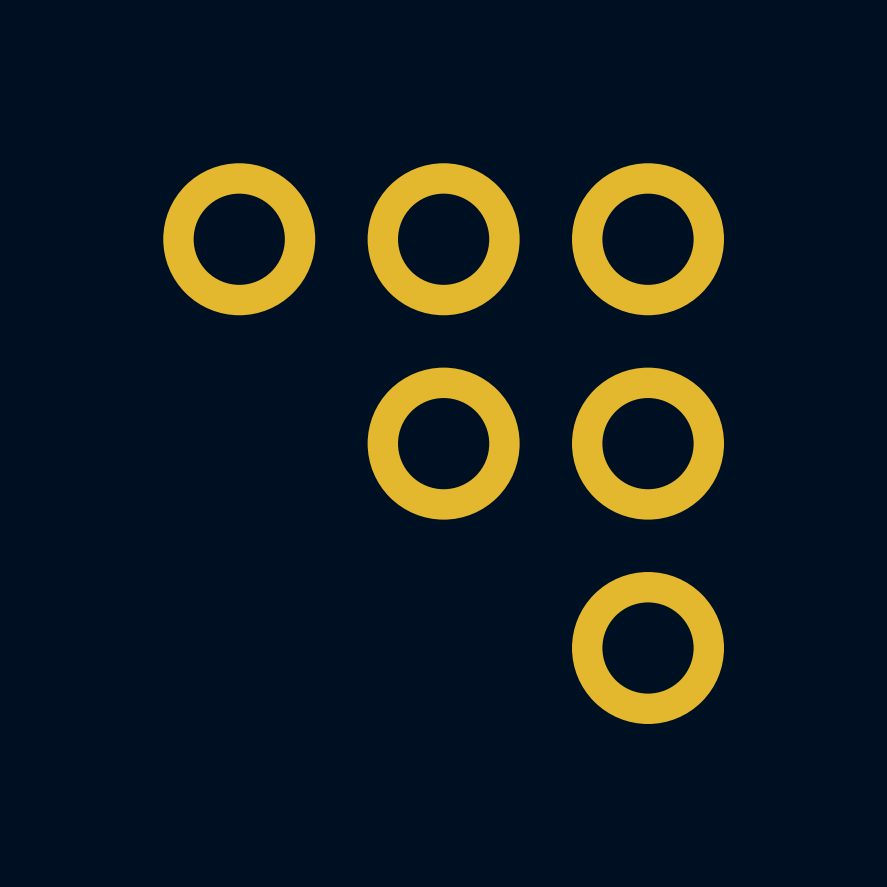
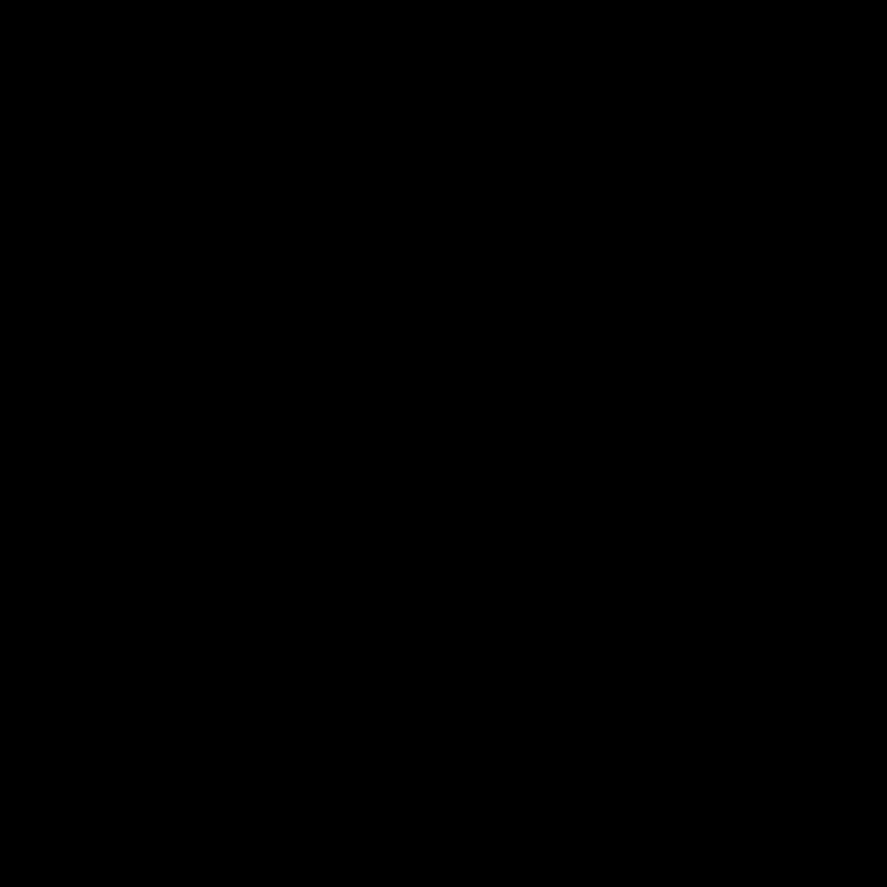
part: (239, 239) -> none
part: (443, 239) -> none
part: (648, 239) -> none
part: (443, 443) -> none
part: (648, 443) -> none
part: (648, 648) -> none

